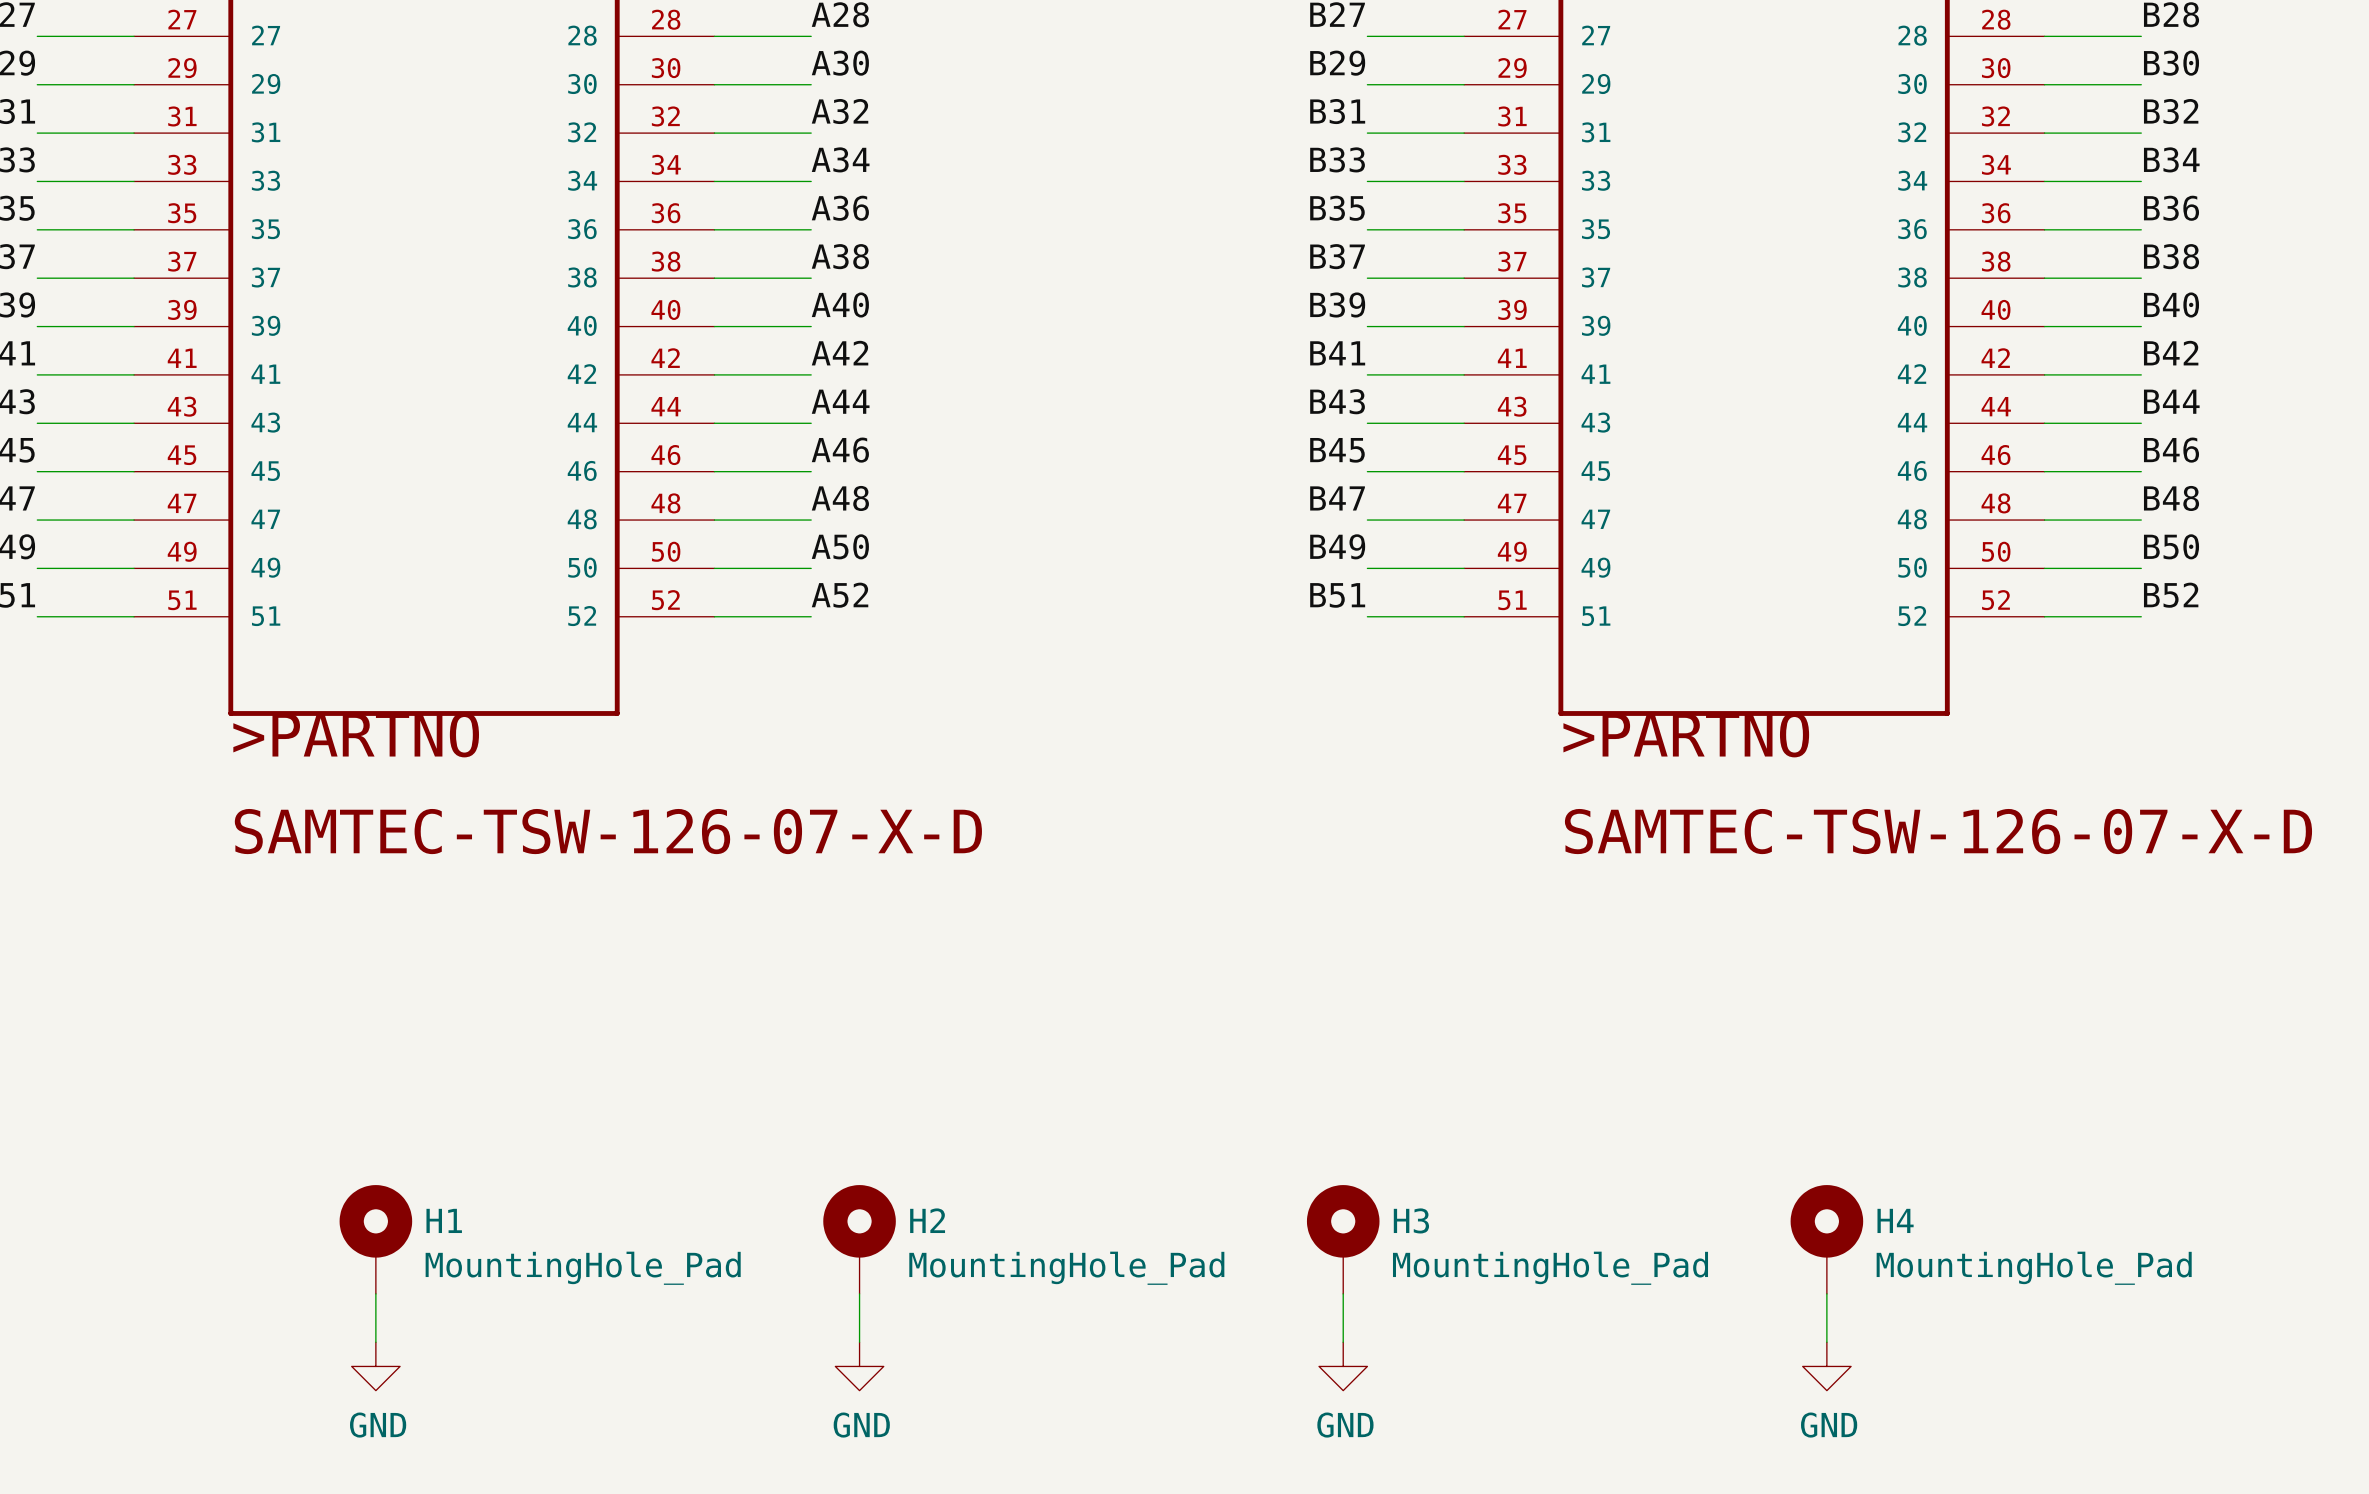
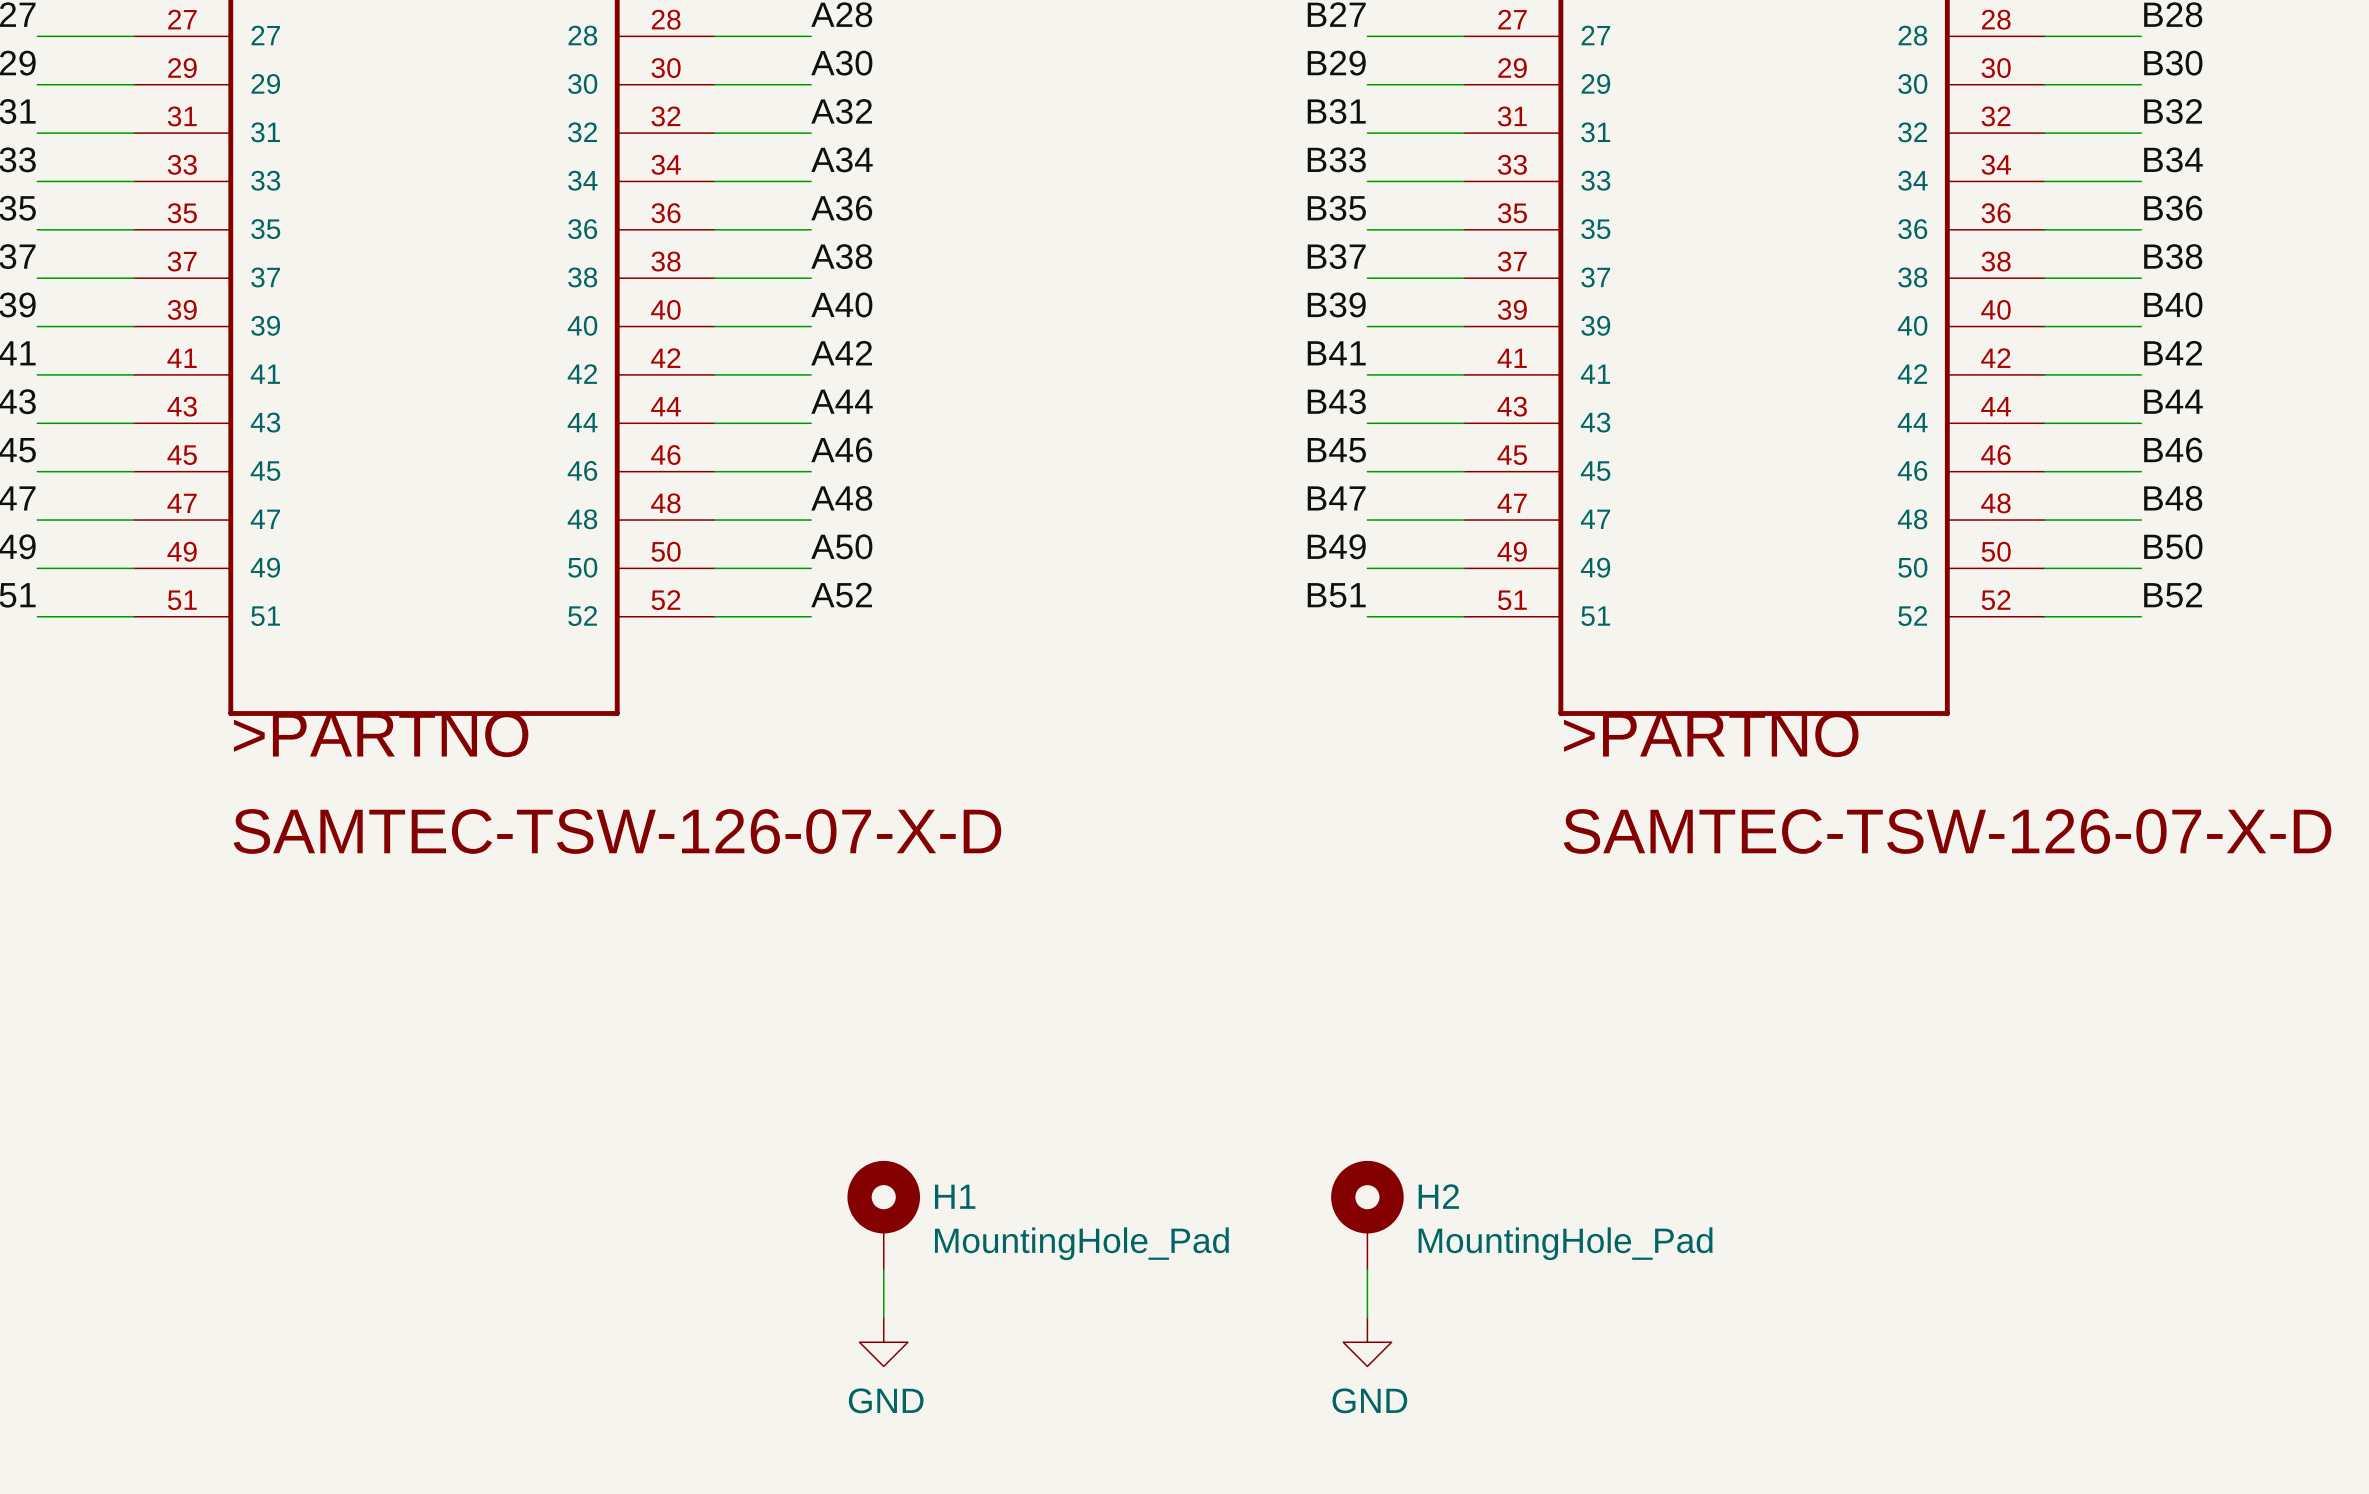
H1 position: (375, 1239) -> (883, 1215)
H2 position: (859, 1239) -> (1367, 1215)
H3: MountingHole_Pad (1343, 1239) -> none
H4: MountingHole_Pad (1826, 1239) -> none
wire: (375, 1293) (375, 1342) -> none
wire: (859, 1293) (859, 1342) -> (883, 1269) (883, 1318)
wire: (1343, 1293) (1343, 1342) -> (1367, 1269) (1367, 1318)
wire: (1826, 1293) (1826, 1342) -> none
power symbol: GND (375, 1366) -> none
power symbol position: GND (859, 1366) -> GND (883, 1342)
power symbol position: GND (1343, 1366) -> GND (1367, 1342)
power symbol: GND (1826, 1366) -> none

